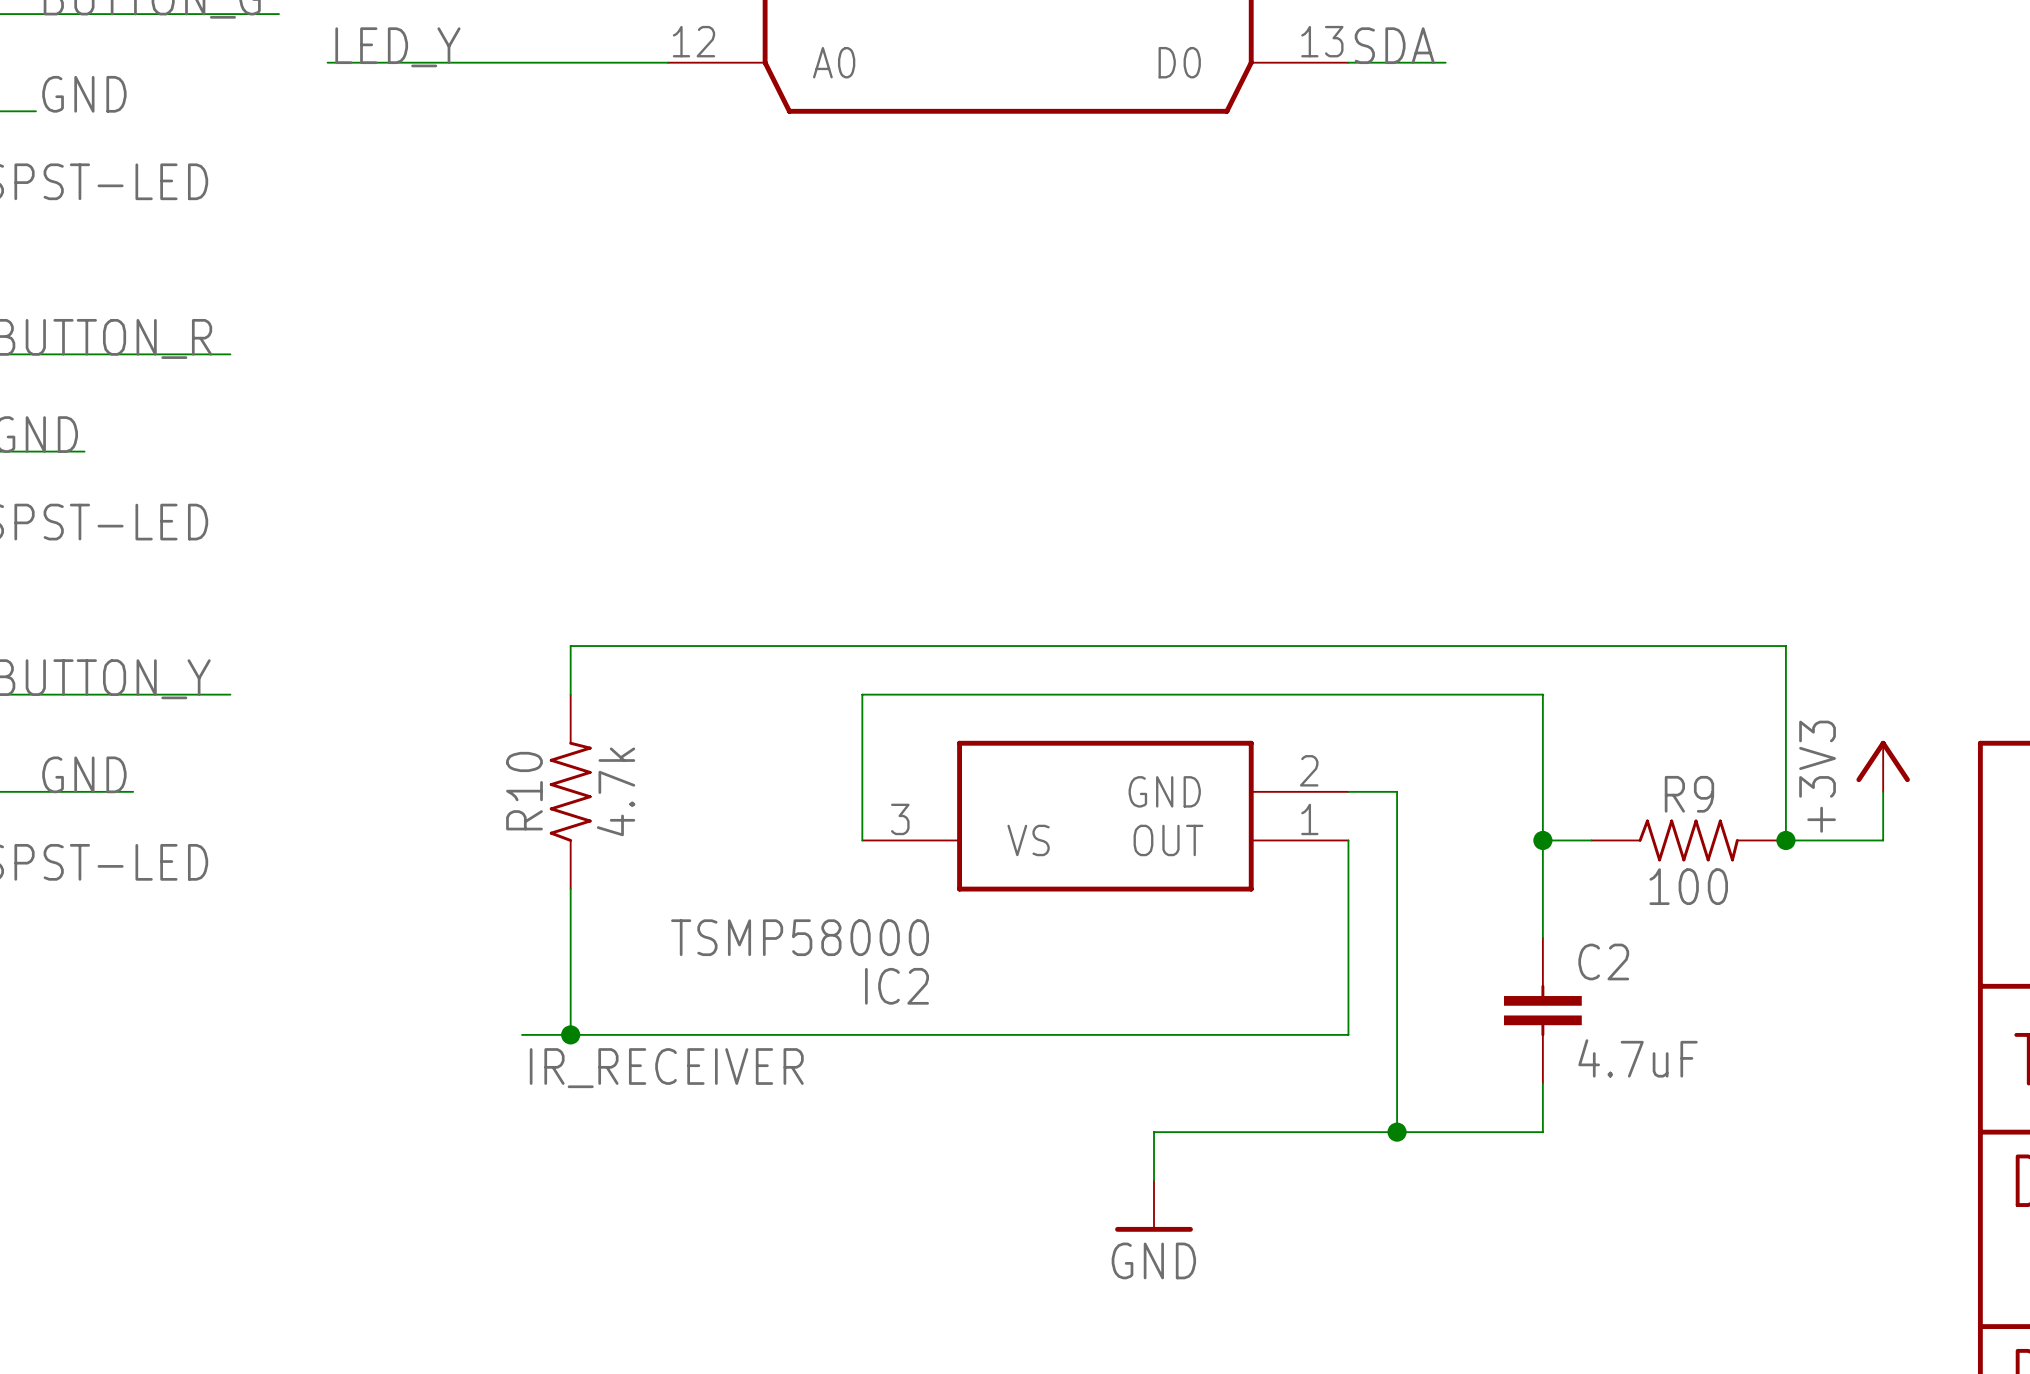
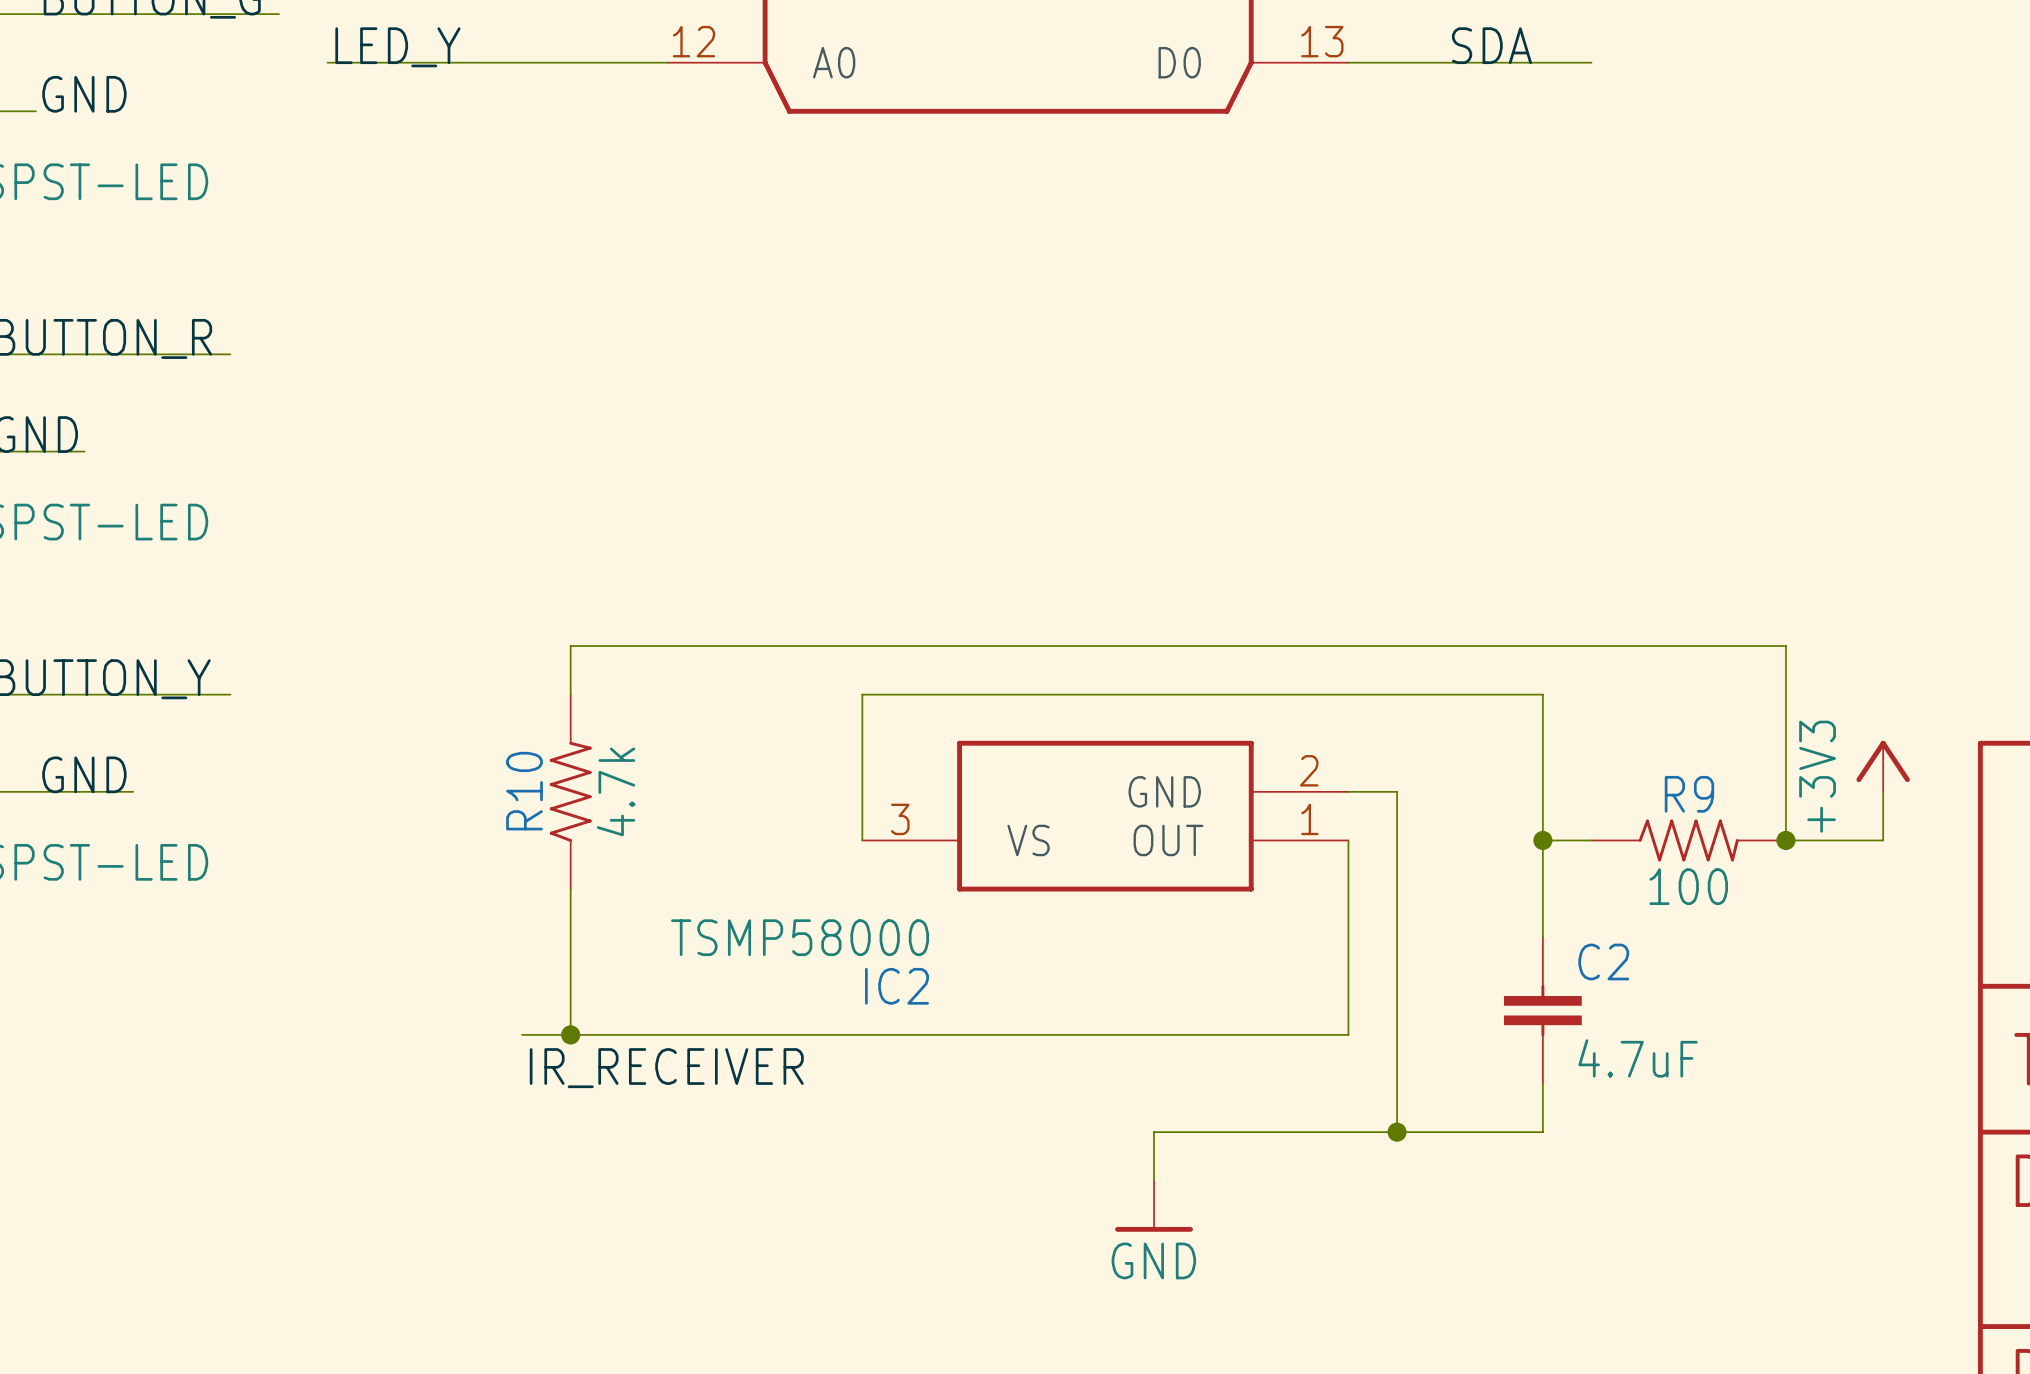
label position: SDA (1394, 45) -> SDA (1491, 45)
wire: none -> (1445, 62) (1591, 62)

